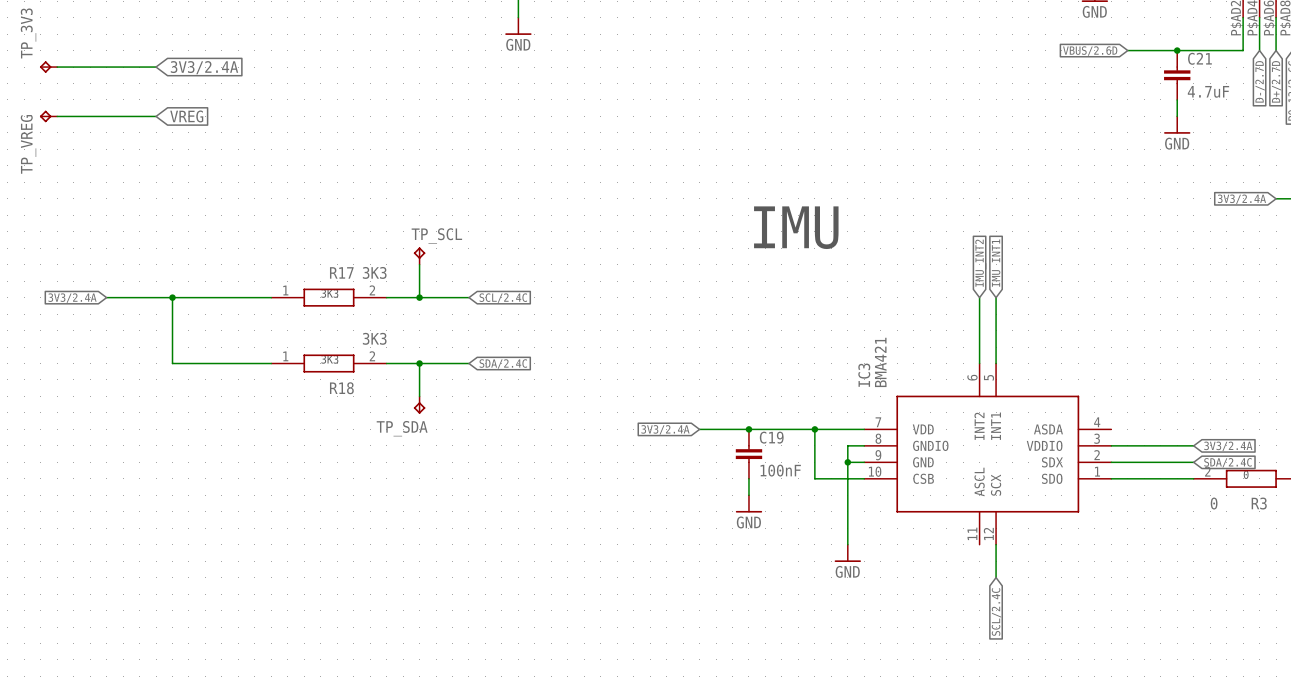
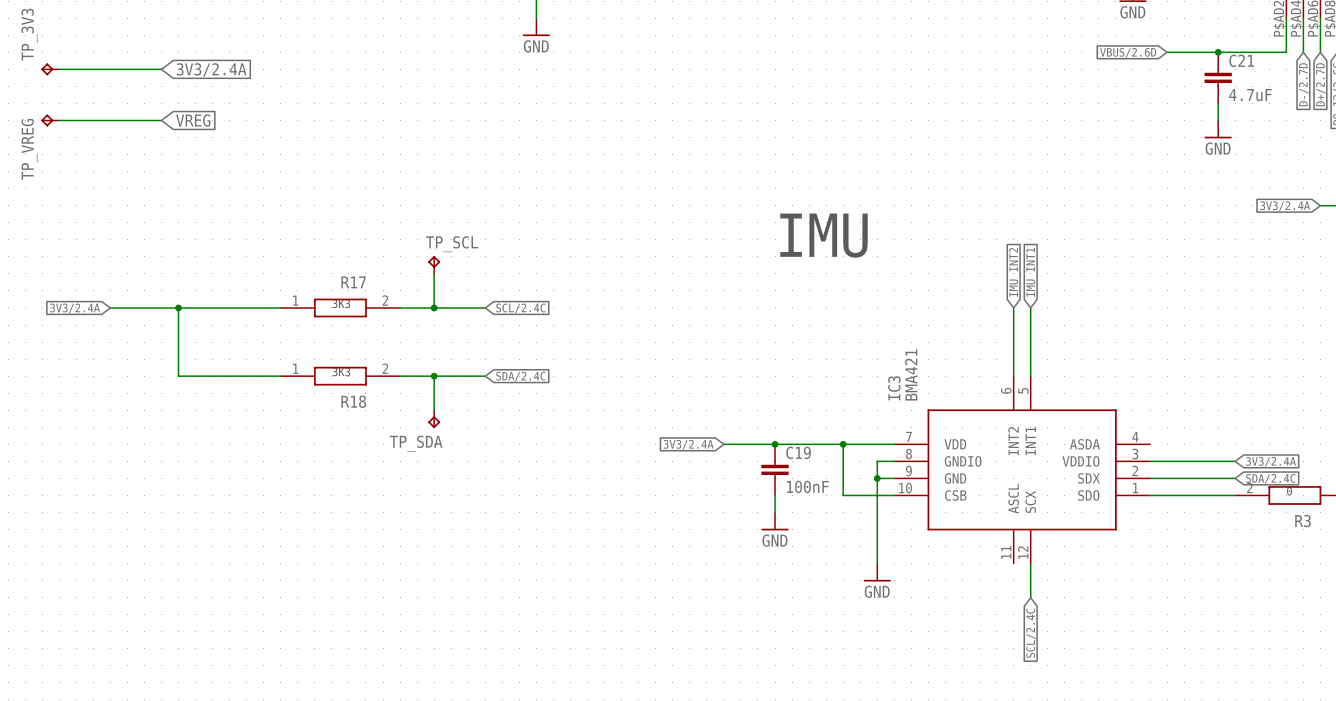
R17 value: 3K3 (374, 272) -> none
R18 value: 3K3 (374, 338) -> none
R3 value: 0 (1214, 503) -> none

